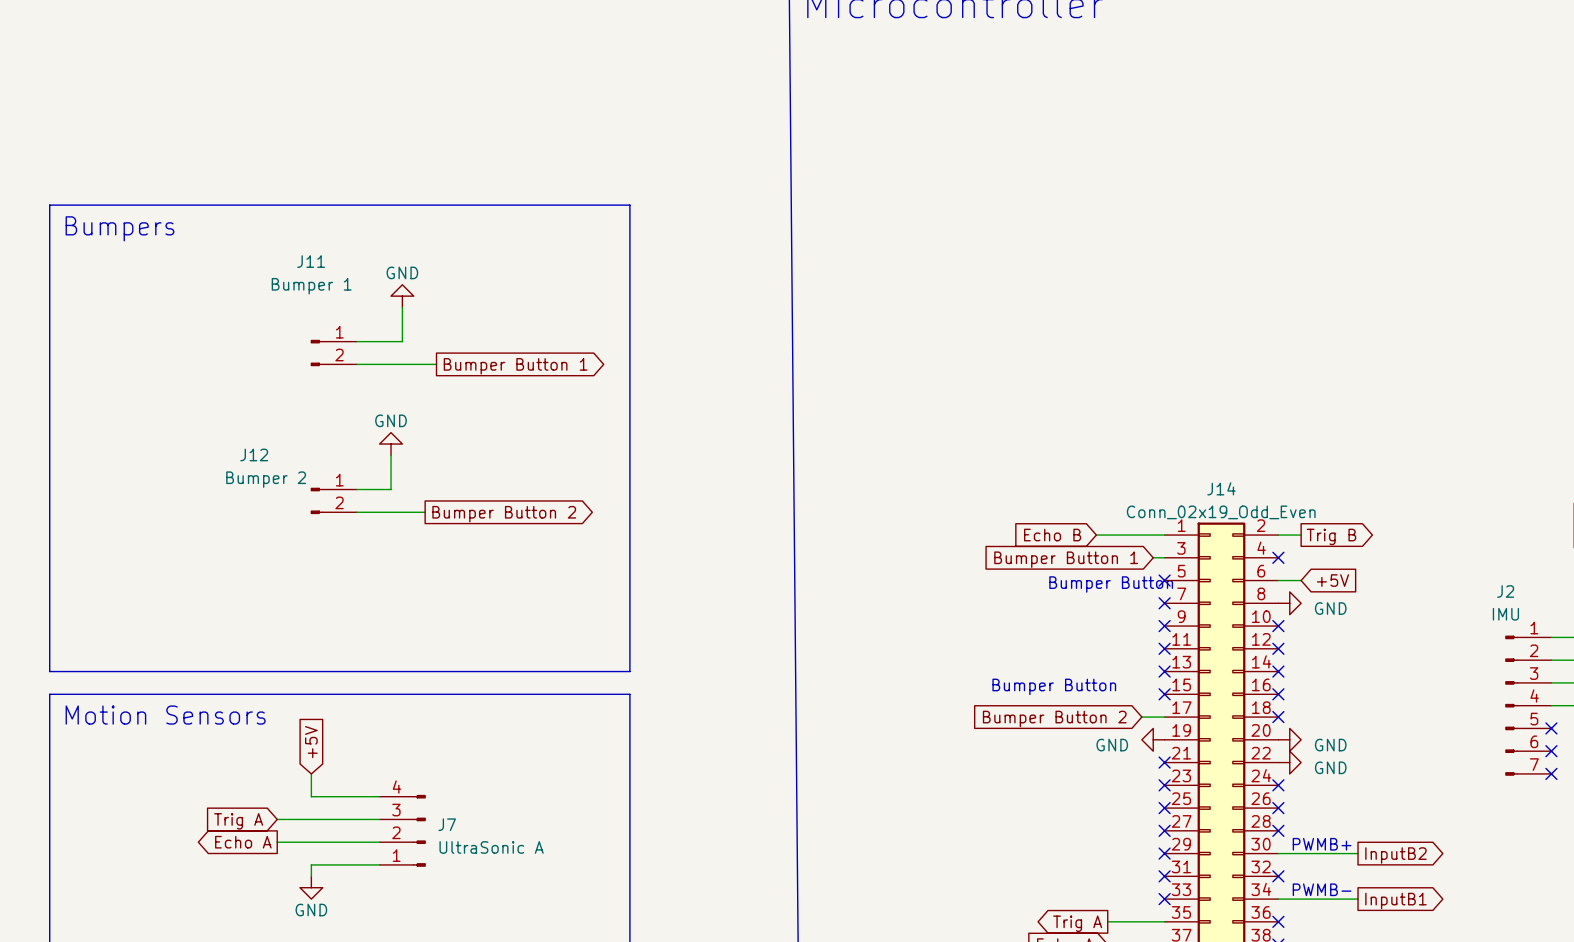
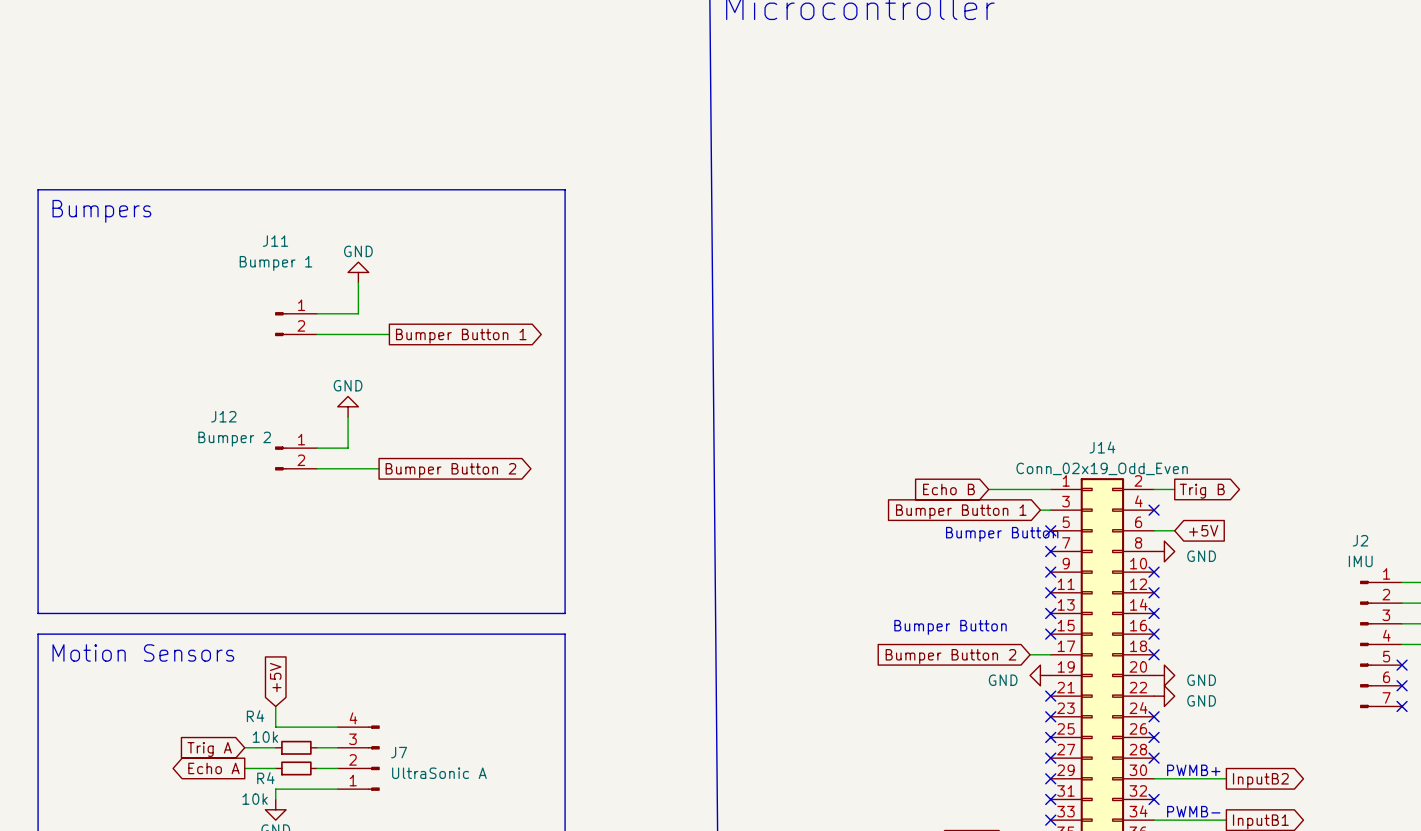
wire: (311, 819) (356, 819) -> none
R4: none -> 10k (296, 747)
wire: (311, 842) (356, 842) -> none
R4: none -> 10k (296, 768)

